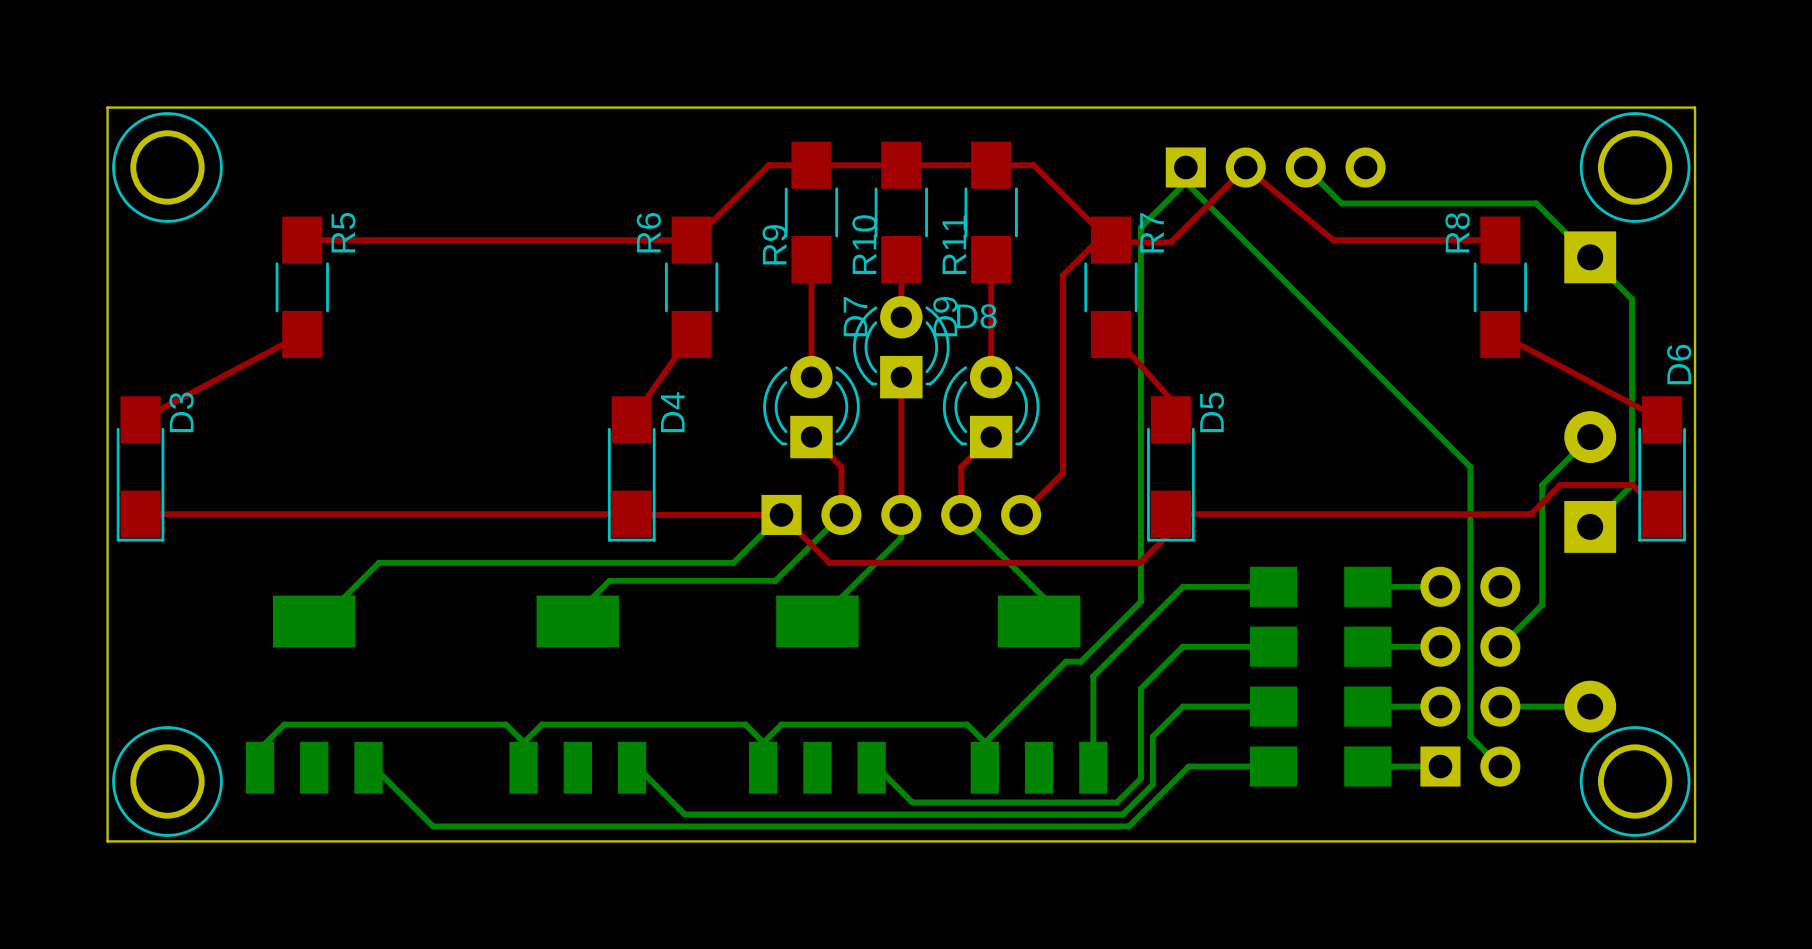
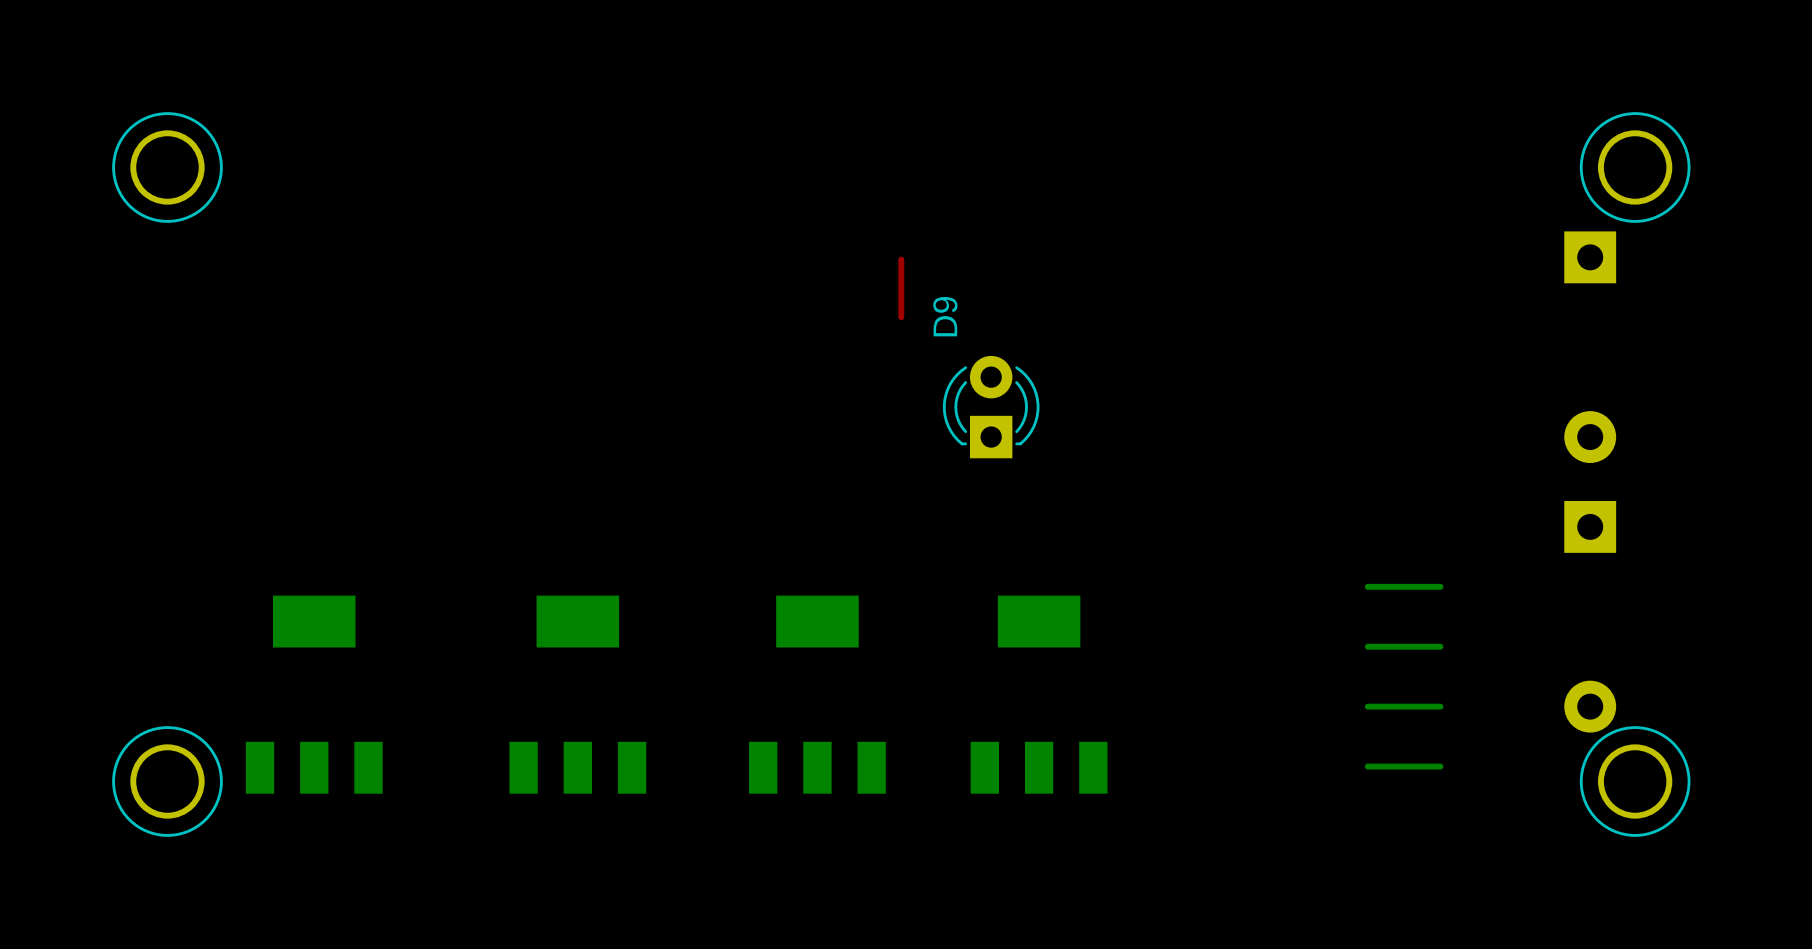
board edge: (107, 107) (107, 841) (1695, 841) (1695, 107) (107, 107) -> none
part: (1275, 167) -> none
bottom track: (1305, 167) (1341, 203) (1536, 203) (1632, 299) (1632, 484) (1590, 526) -> none
bottom track: (1185, 182) (1140, 227) (1140, 601) (1081, 661) (1066, 661) (984, 742) (984, 767) -> none
bottom track: (1185, 182) (1470, 467) (1470, 736) (1500, 766) (1500, 781) -> none
R9: (811, 212) -> none
R10: (901, 212) -> none
R11: (991, 212) -> none
top track: (302, 240) (691, 240) -> none
top track: (693, 240) (768, 165) (1033, 165) (1108, 240) -> none
top track: (1500, 240) (1333, 240) (1245, 167) (1170, 242) (1113, 242) (1110, 240) (1098, 240) (1063, 275) (1063, 473) (1021, 514) -> none
top track: (811, 259) (811, 377) -> none
top track: (991, 259) (991, 377) -> none
R5: (302, 287) -> none
R6: (691, 287) -> none
R7: (1110, 287) -> none
R8: (1500, 287) -> none
top track: (1107, 328) (1188, 419) -> none
top track: (302, 334) (140, 419) -> none
top track: (691, 334) (631, 419) -> none
top track: (1500, 334) (1662, 419) -> none
D8: (901, 347) -> none
top track: (901, 377) (901, 514) -> none
D7: (811, 407) -> none
top track: (811, 437) (841, 467) (841, 514) -> none
top track: (991, 437) (961, 467) (961, 514) -> none
bottom track: (1590, 437) (1542, 484) (1542, 604) (1500, 646) -> none
D3: (140, 468) -> none
D4: (631, 468) -> none
D5: (1170, 468) -> none
D6: (1662, 468) -> none
top track: (140, 514) (631, 514) -> none
bottom track: (781, 514) (733, 562) (378, 562) (320, 621) -> none
bottom track: (841, 514) (775, 580) (609, 580) (571, 618) -> none
bottom track: (901, 514) (901, 537) (817, 621) -> none
part: (901, 514) -> none
bottom track: (961, 514) (1051, 604) (1051, 615) -> none
top track: (1662, 514) (1632, 484) (1560, 484) (1531, 514) (1188, 514) (1140, 562) (829, 562) (781, 514) (632, 514) -> none
bottom track: (1273, 586) (1182, 586) (1093, 676) (1093, 767) -> none
part: (1320, 586) -> none
bottom track: (1273, 646) (1182, 646) (1140, 688) (1140, 778) (1116, 802) (912, 802) (877, 767) -> none
part: (1320, 646) -> none
part: (1470, 676) -> none
bottom track: (1273, 706) (1182, 706) (1152, 736) (1152, 784) (1122, 814) (684, 814) (638, 767) -> none
part: (1320, 706) -> none
bottom track: (1500, 706) (1590, 706) -> none
bottom track: (523, 742) (541, 724) (745, 724) (763, 742) (763, 767) -> none
bottom track: (984, 742) (967, 724) (781, 724) (763, 742) -> none
bottom track: (1273, 766) (1188, 766) (1128, 826) (433, 826) (375, 767) -> none
part: (1320, 766) -> none
bottom track: (266, 767) (266, 742) (284, 724) (505, 724) (523, 742) (523, 767) -> none

